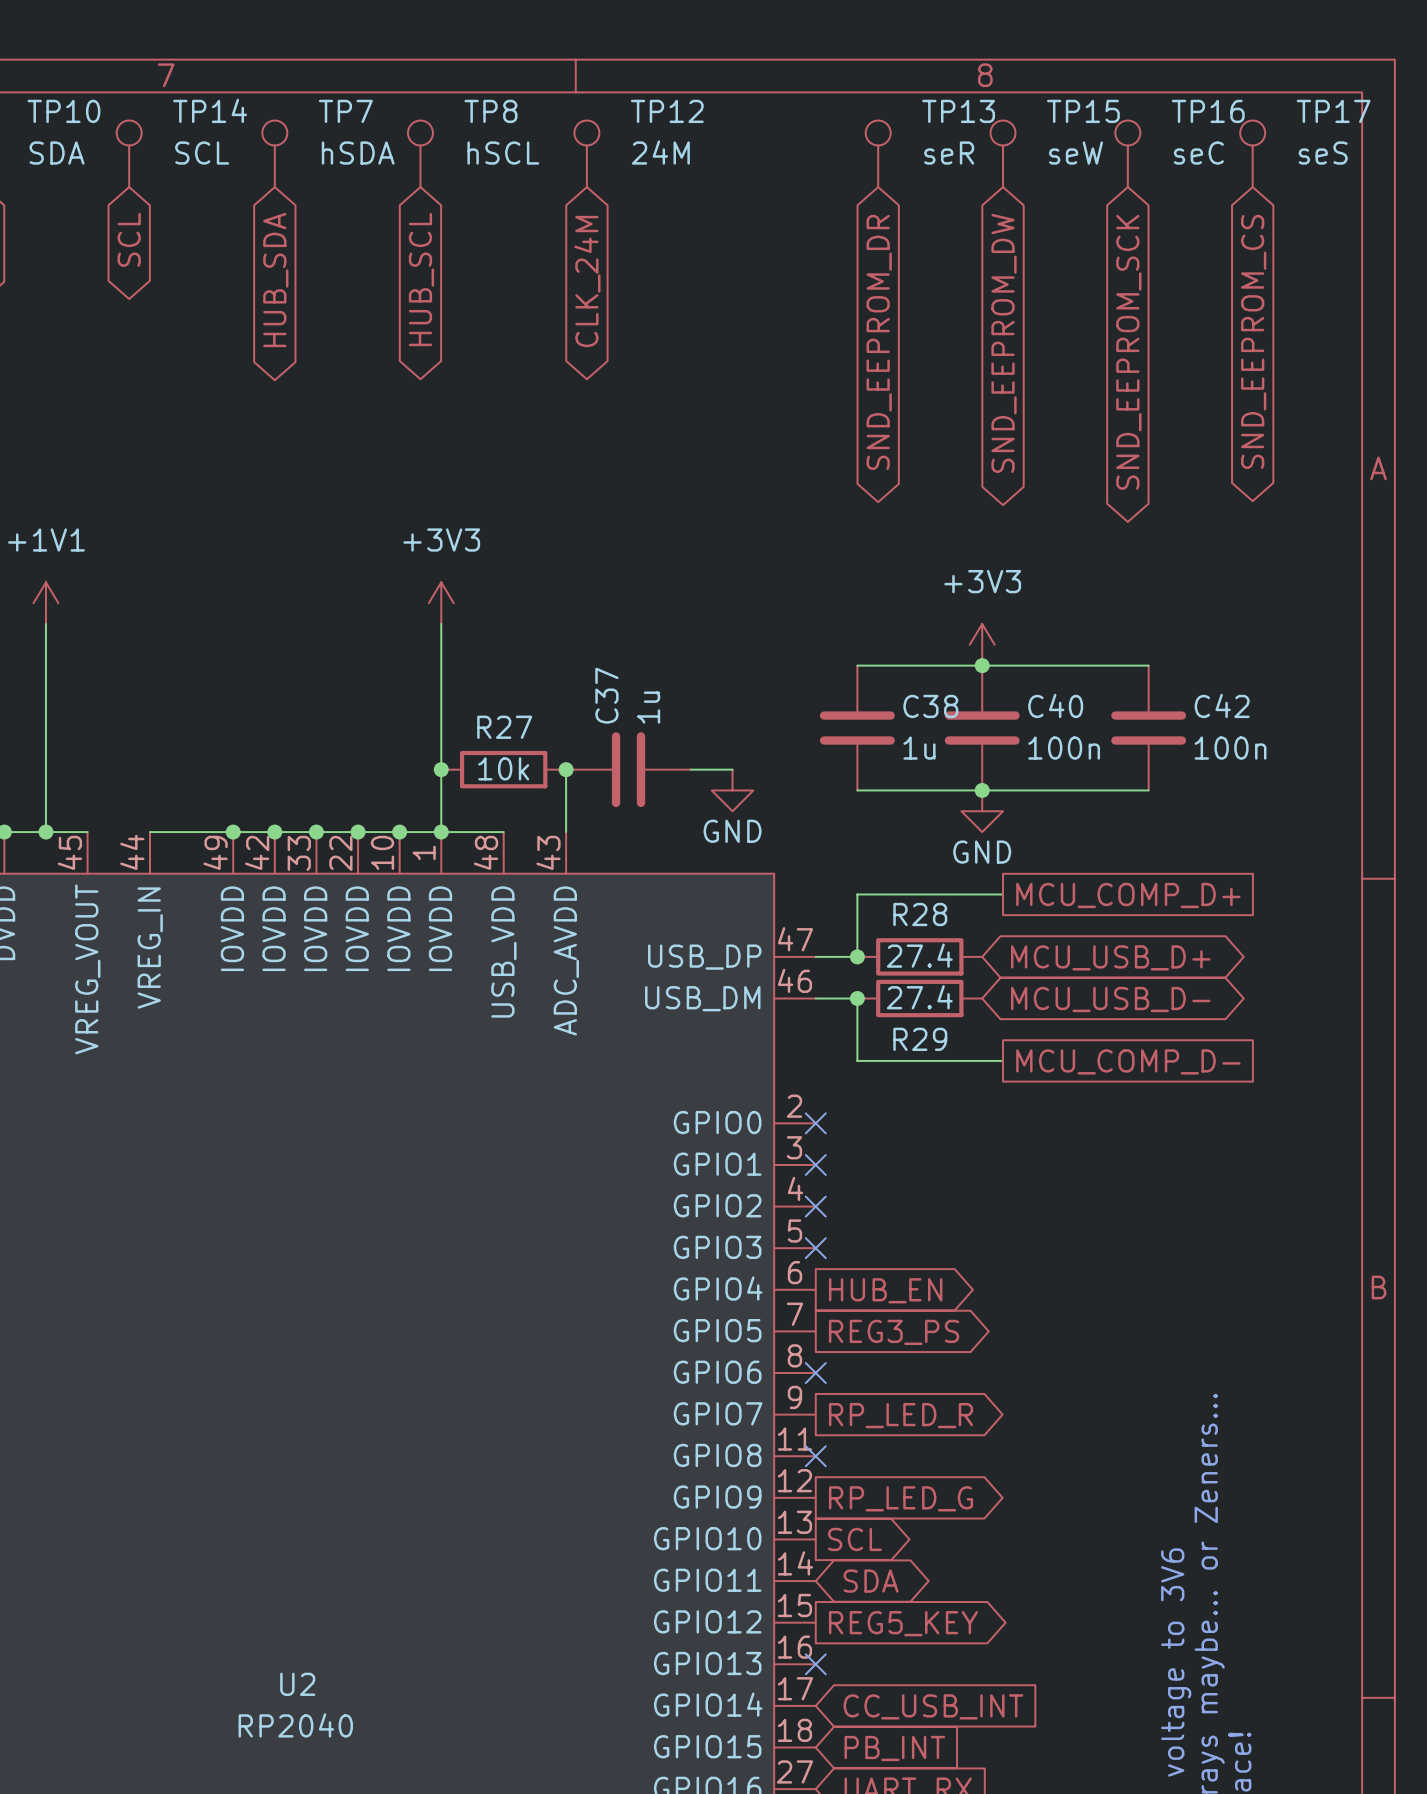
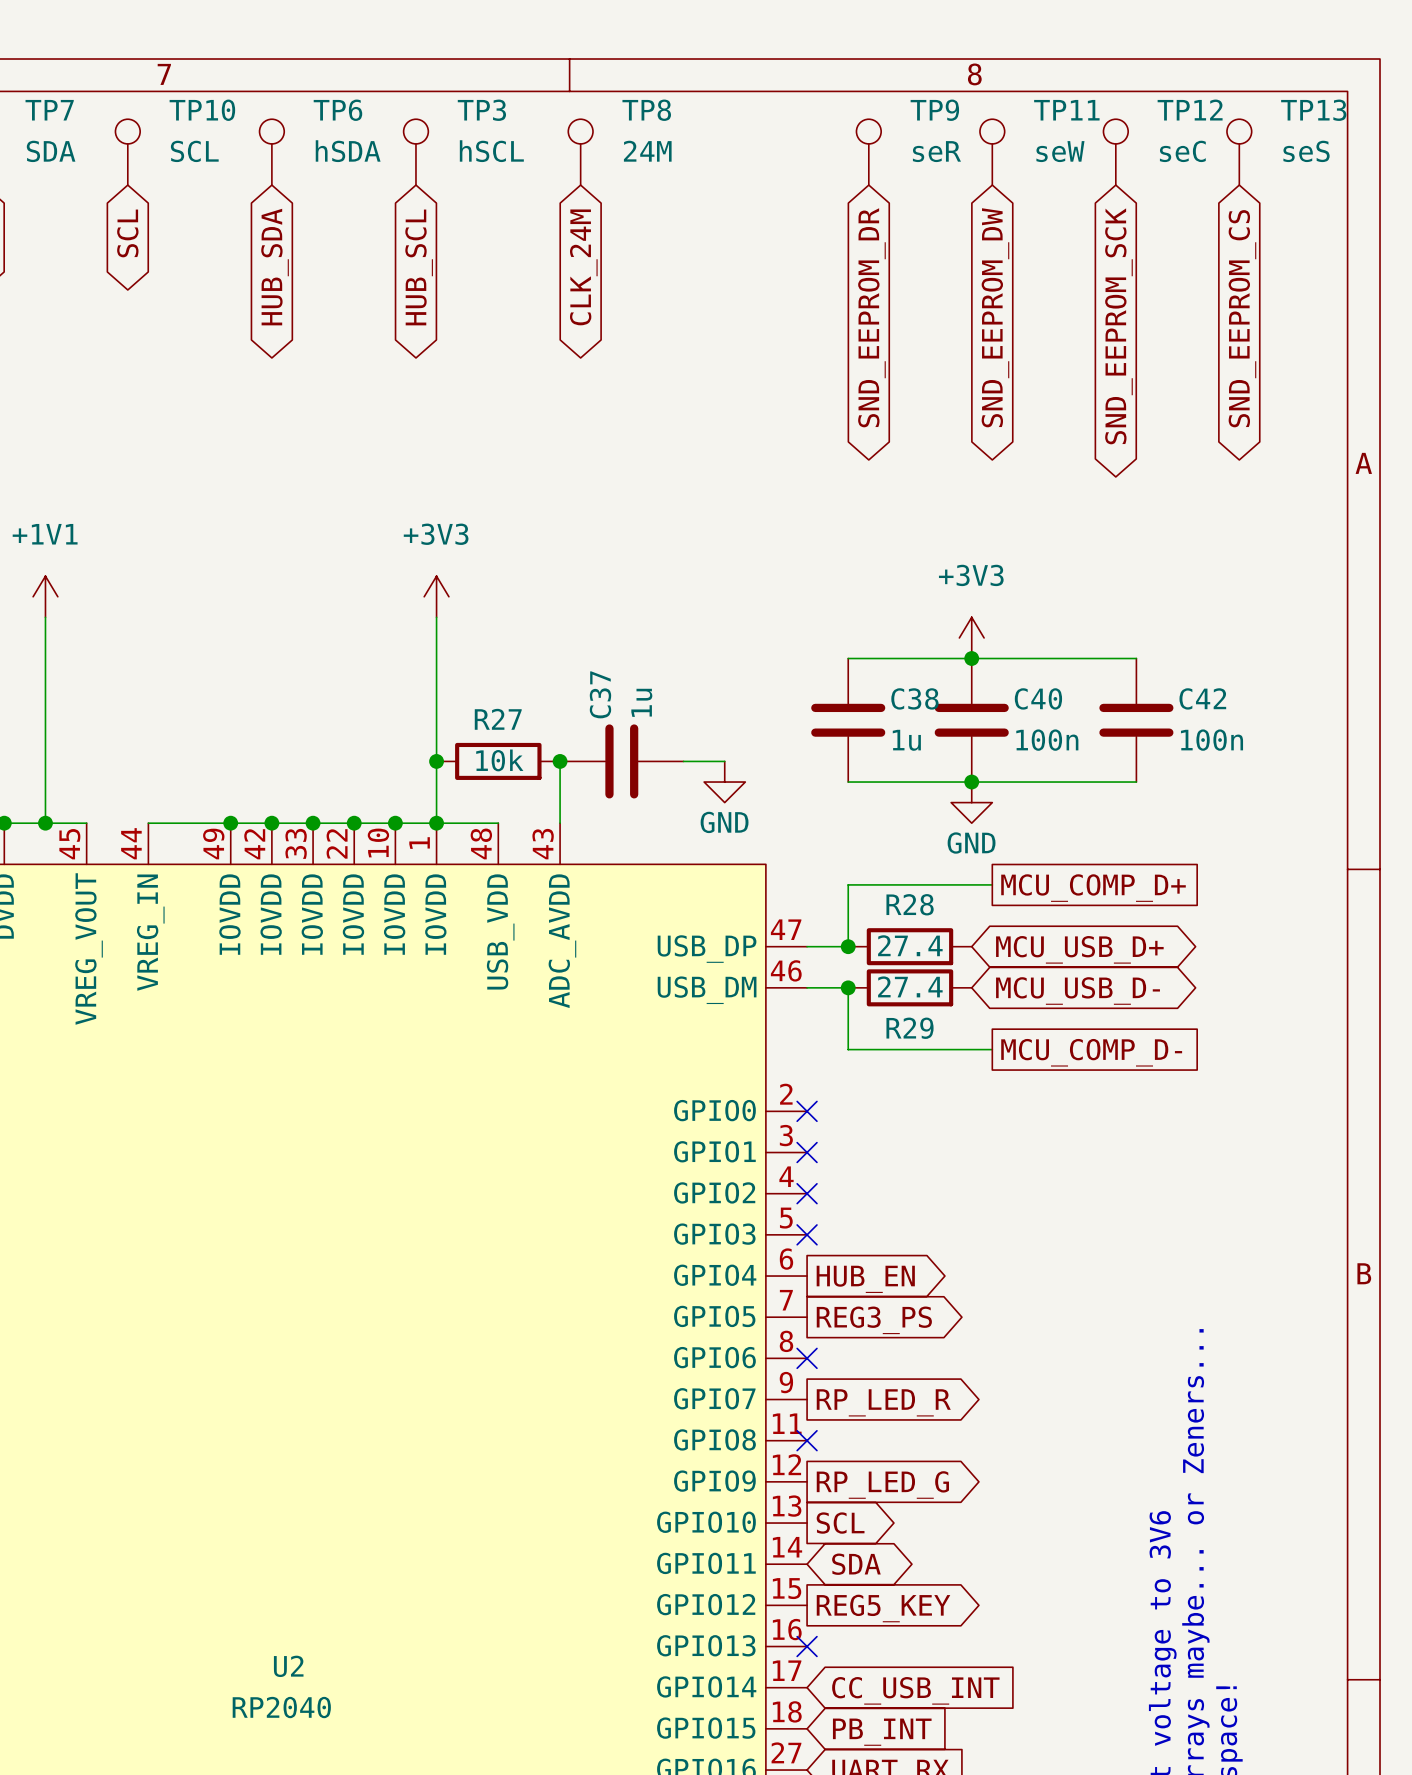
TP14 name: TP14 (210, 110) -> TP10 (202, 110)
TP10 name: TP10 (63, 111) -> TP7 (49, 110)
TP7 name: TP7 (345, 111) -> TP6 (337, 110)
TP8 name: TP8 (490, 111) -> TP3 (481, 110)
TP12 name: TP12 (667, 111) -> TP8 (646, 110)
TP13 name: TP13 (958, 111) -> TP9 (934, 110)
TP15 name: TP15 (1083, 111) -> TP11 (1066, 110)
TP16 name: TP16 (1208, 111) -> TP12 (1190, 110)
TP17 name: TP17 (1333, 111) -> TP13 (1313, 110)

